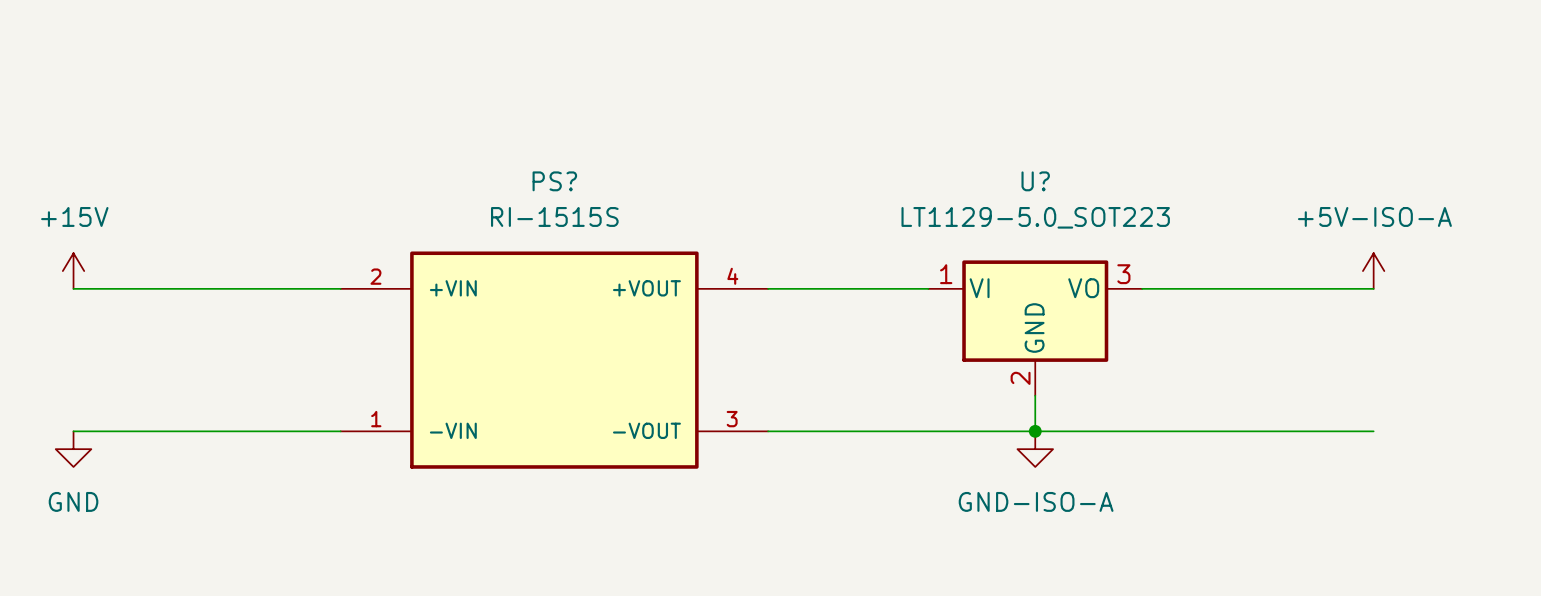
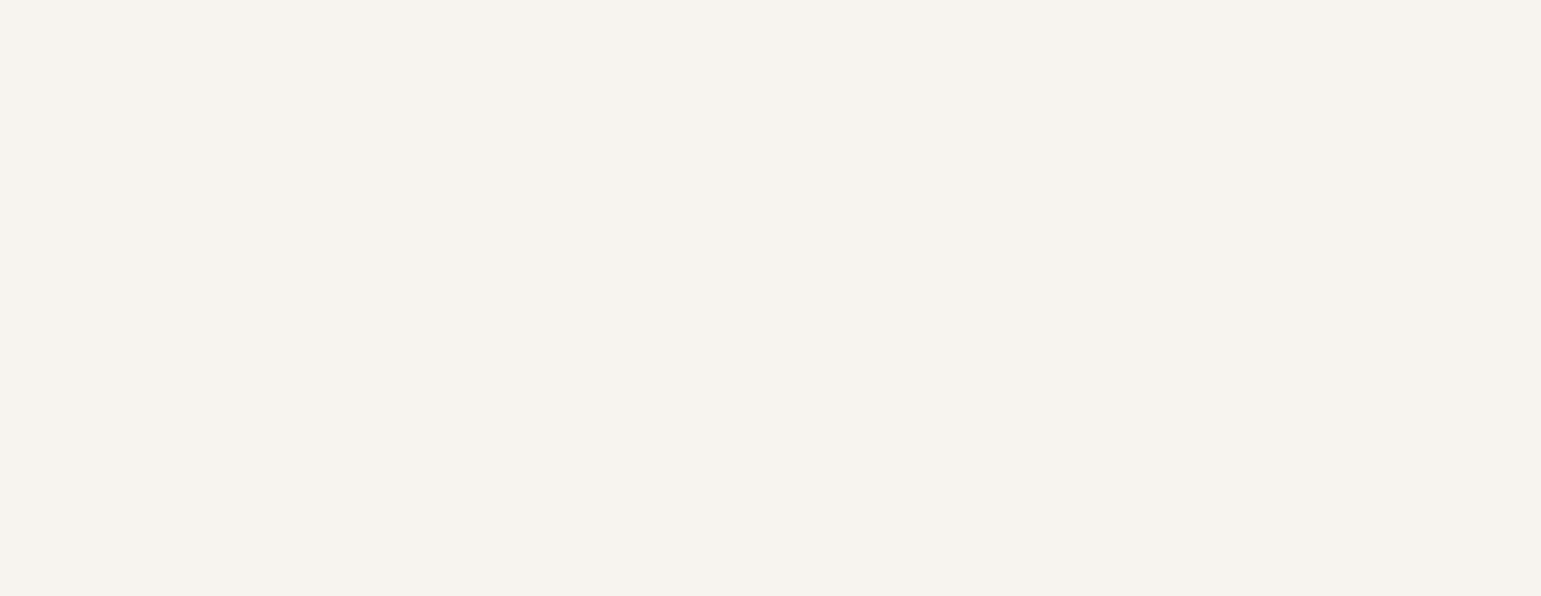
power symbol: +15V (73, 271) -> none
power symbol: +5V-ISO-A (1373, 271) -> none
wire: (73, 288) (340, 288) -> none
wire: (768, 288) (928, 288) -> none
wire: (1142, 288) (1373, 288) -> none
U?: LT1129-5.0_SOT223 (1035, 328) -> none
PS?: RI-1515S (554, 360) -> none
wire: (1035, 395) (1035, 431) -> none
wire: (73, 431) (340, 431) -> none
wire: (768, 431) (1373, 431) -> none
junction: (1035, 431) -> none
power symbol: GND (73, 449) -> none
power symbol: GND-ISO-A (1035, 449) -> none

